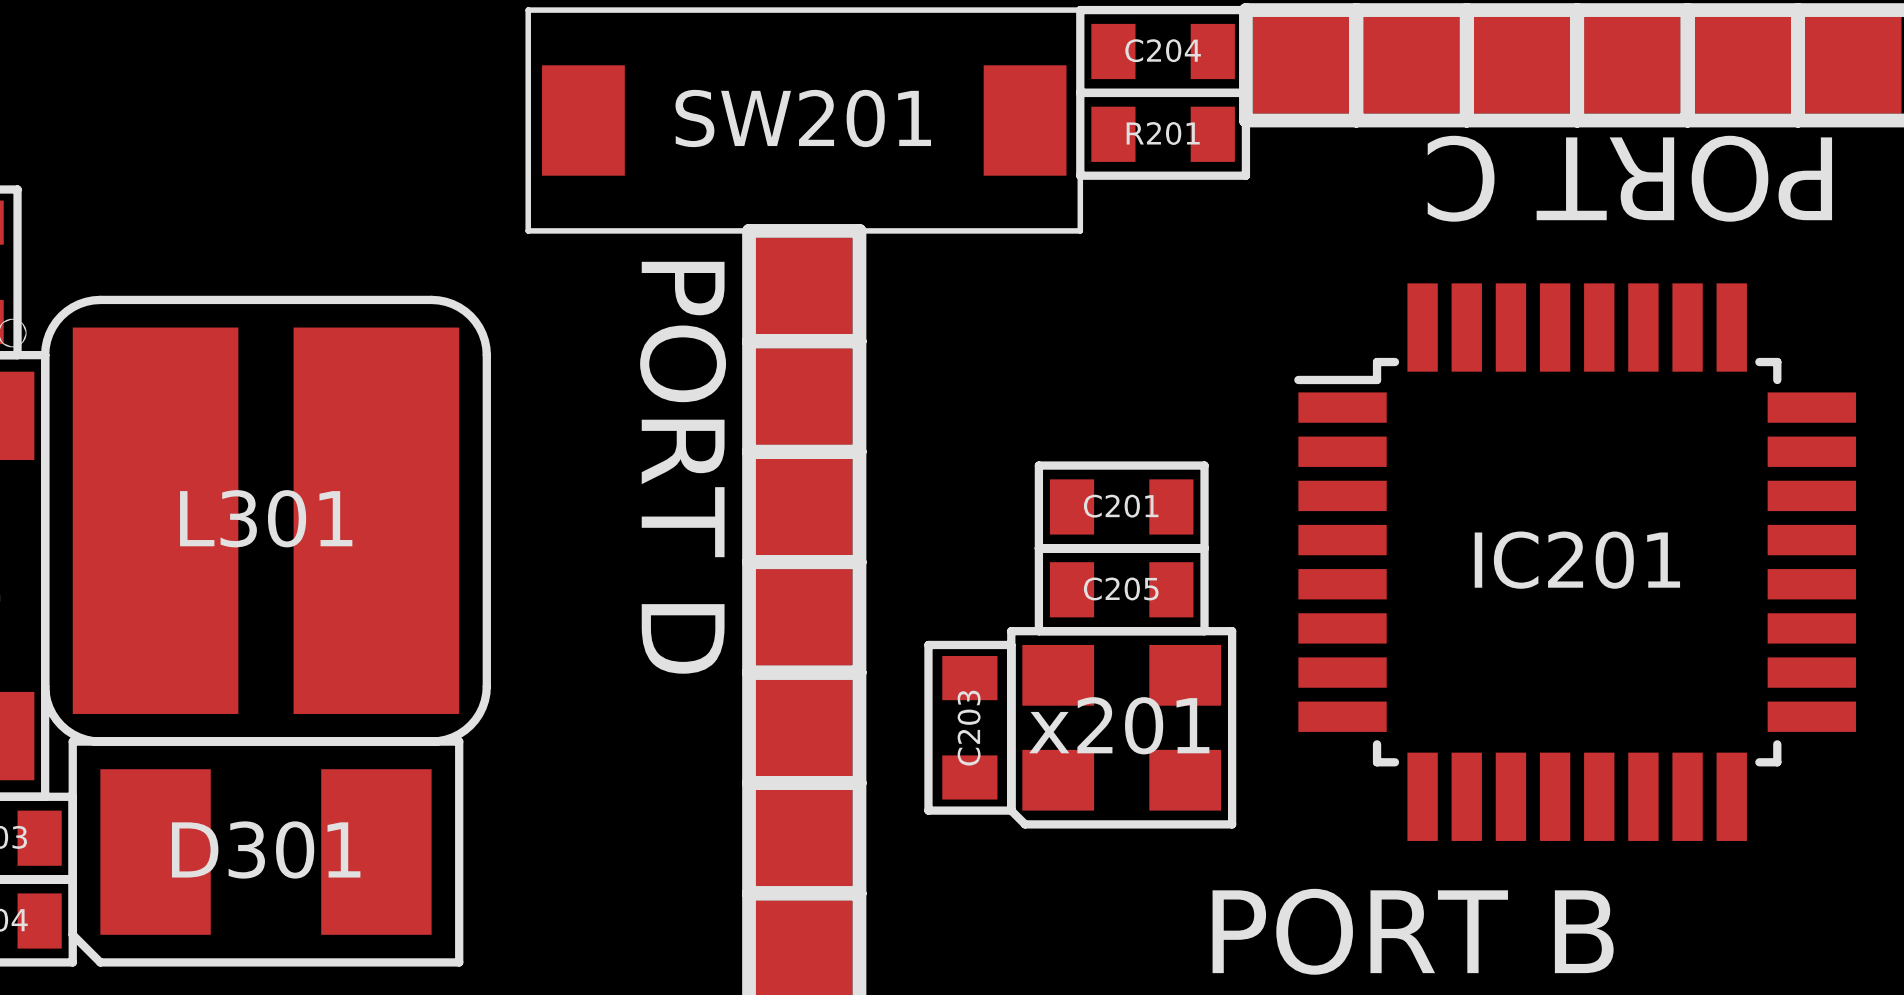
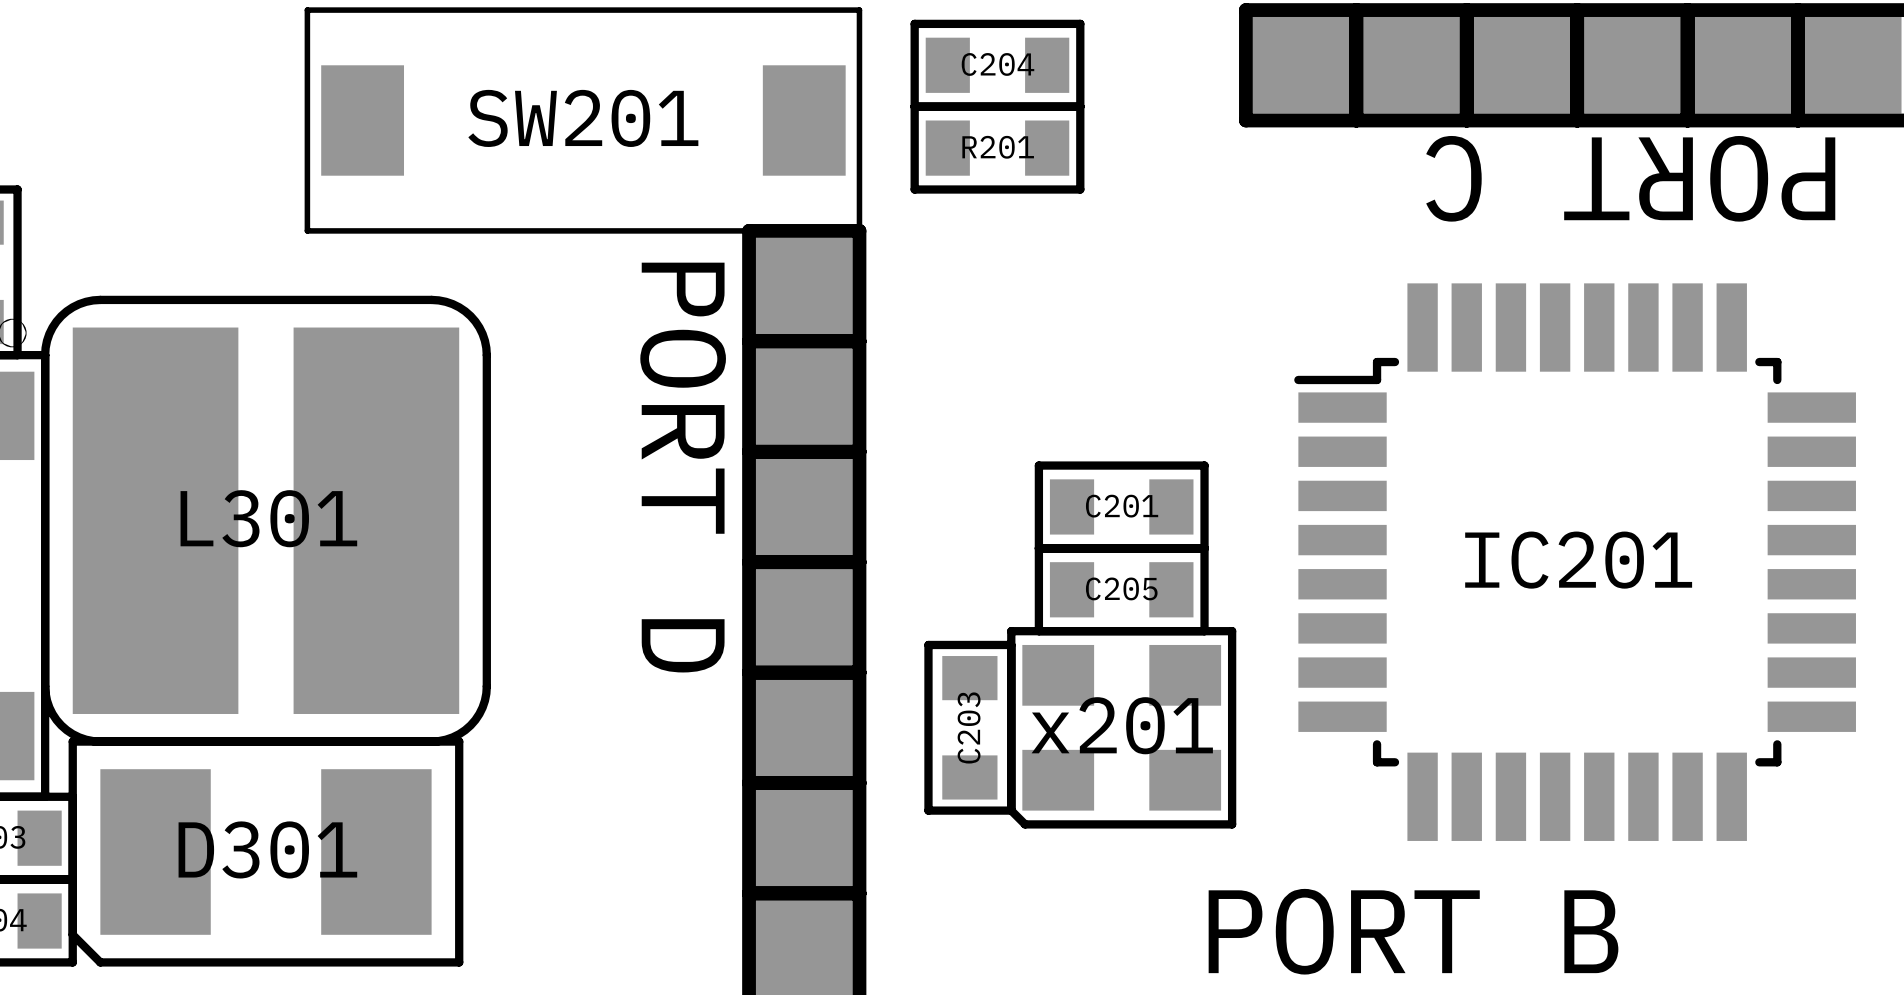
C204 position: (1163, 51) -> (997, 65)
SW201 position: (804, 120) -> (583, 120)
R201 position: (1163, 134) -> (997, 148)

